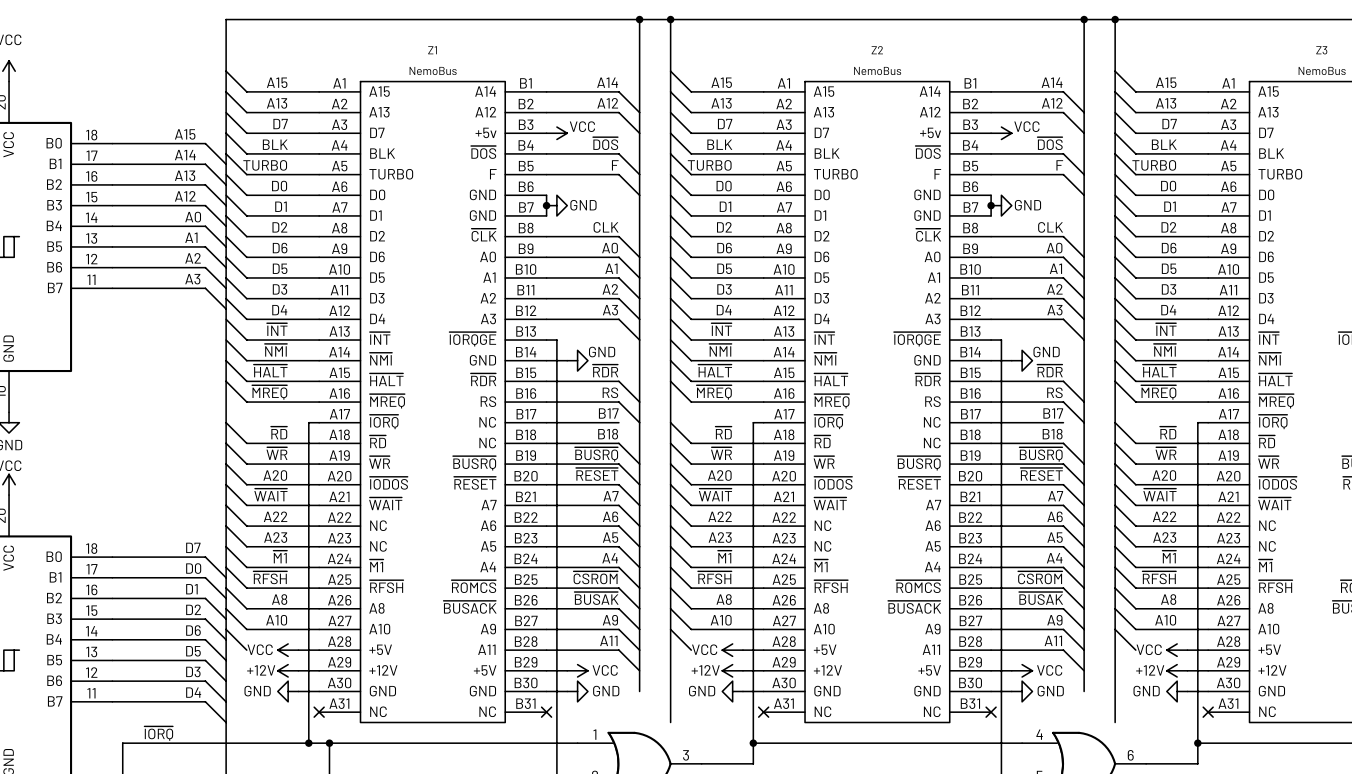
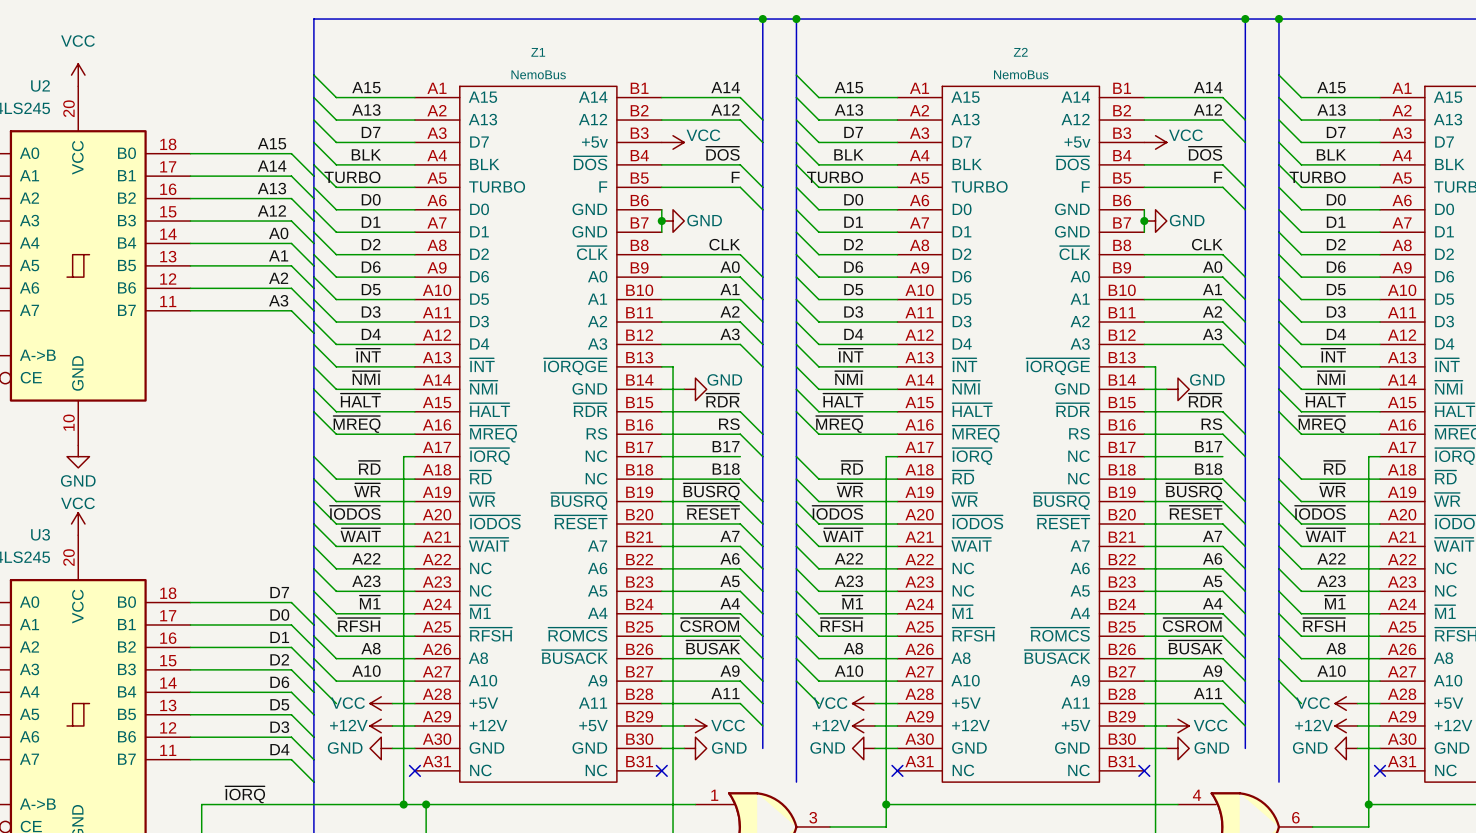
label: A20 (275, 475) -> ~{IODOS} (355, 512)
label: A20 (719, 475) -> ~{IODOS} (837, 512)
label: A20 (1164, 475) -> ~{IODOS} (1320, 512)

